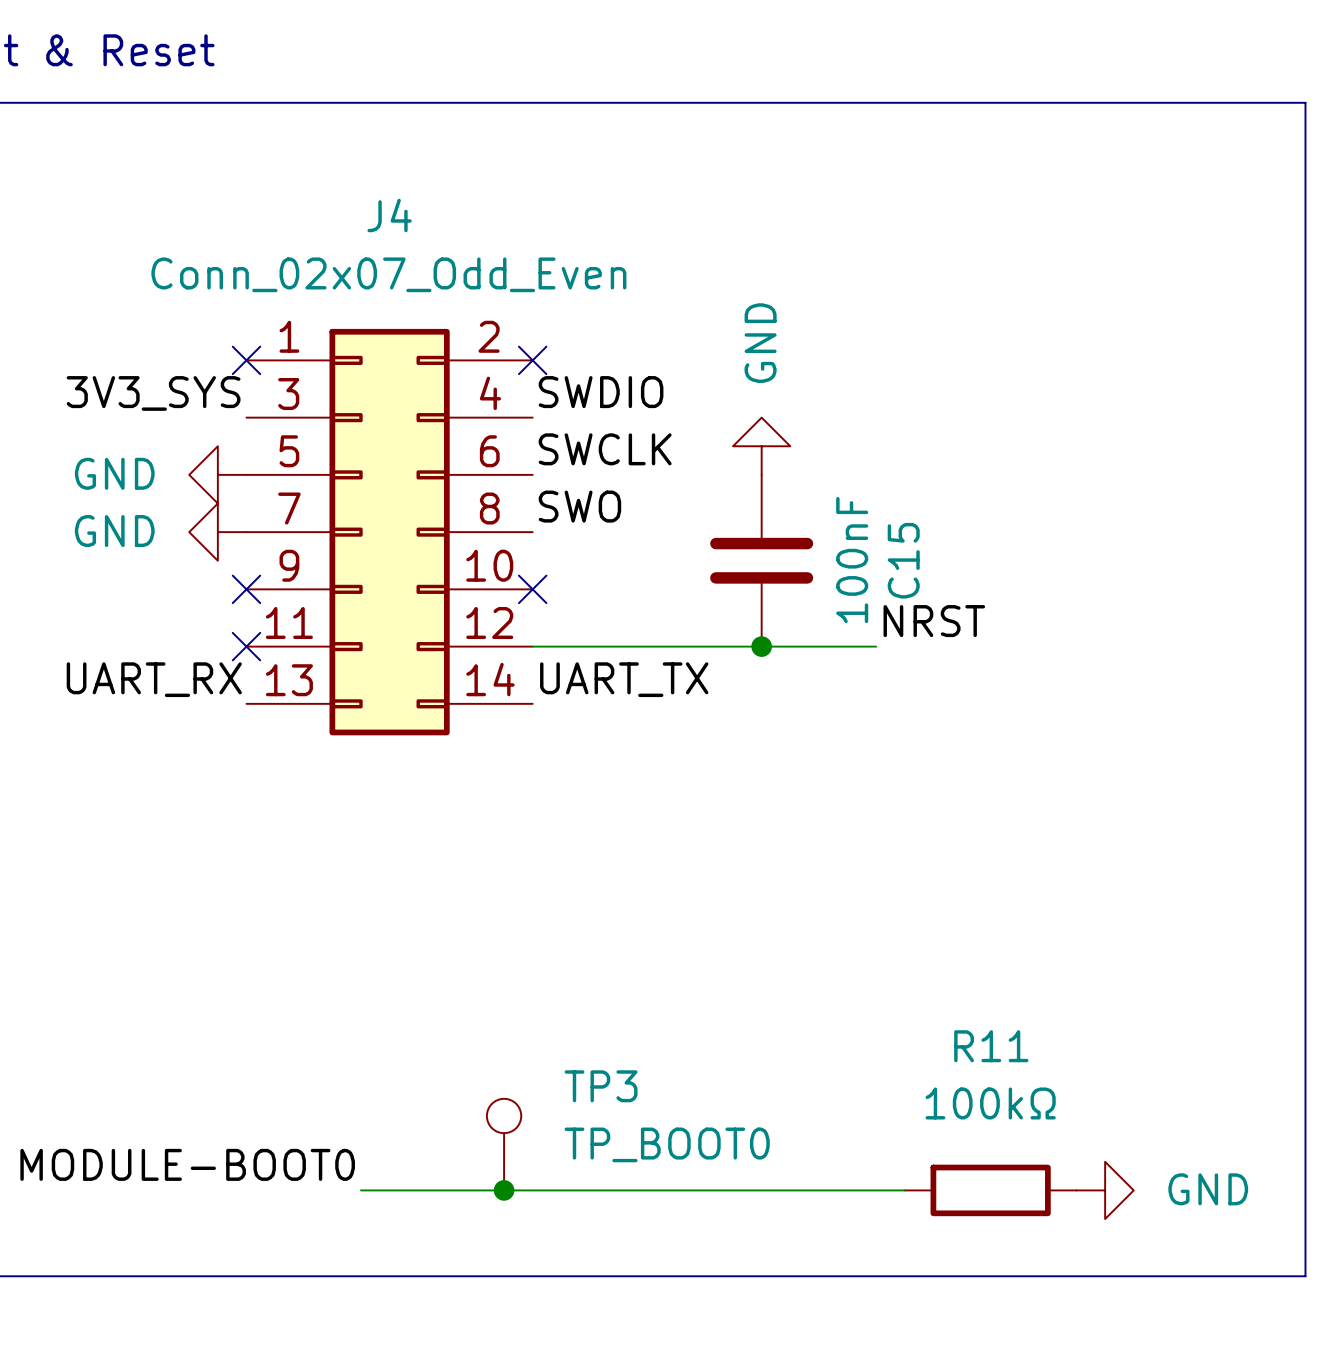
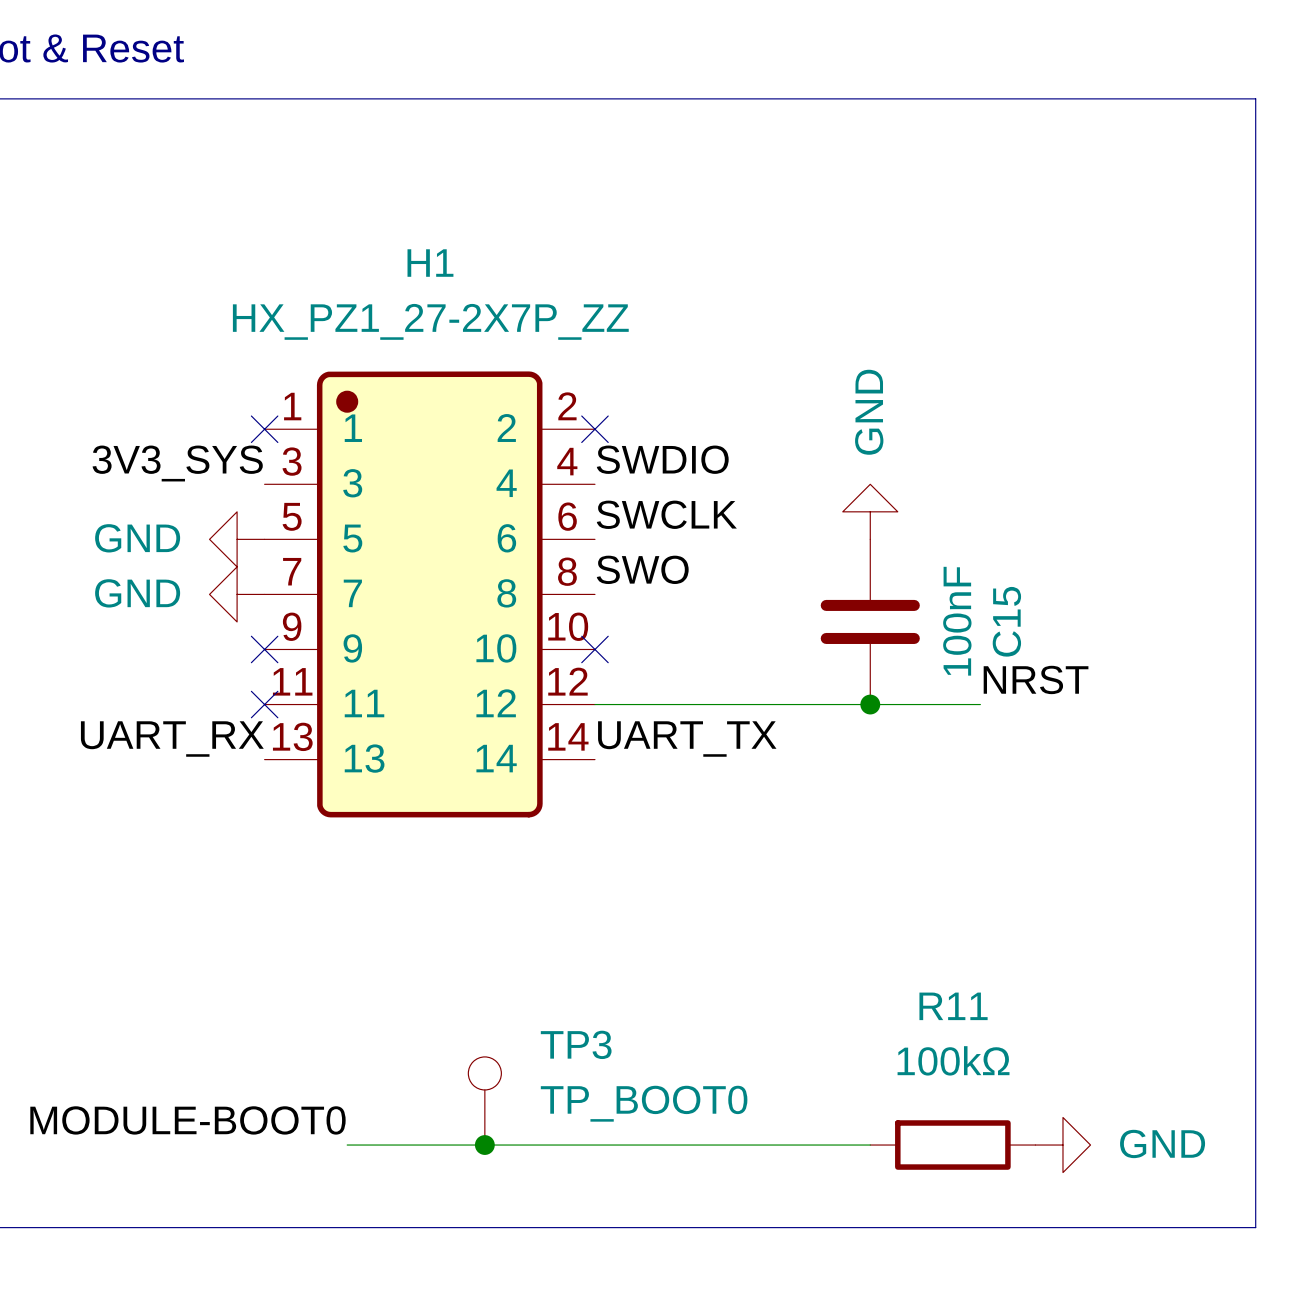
no-connect mark: (246, 360) -> none
no-connect mark: (532, 360) -> none
label position: SWDIO (601, 392) -> SWDIO (662, 459)
label position: 3V3_SYS (153, 393) -> 3V3_SYS (177, 463)
no-connect mark: none -> (264, 429)
no-connect mark: none -> (594, 429)
power symbol position: GND (761, 446) -> GND (870, 511)
label position: SWCLK (605, 449) -> SWCLK (666, 514)
power symbol: GND (217, 474) -> none
label position: SWO (579, 506) -> SWO (642, 569)
power symbol position: GND (217, 532) -> GND (237, 539)
J4: Conn_02x07_Odd_Even (389, 532) -> none
C15 position: (761, 560) -> (870, 621)
no-connect mark: (246, 589) -> none
no-connect mark: (532, 589) -> none
power symbol: none -> GND (237, 594)
H1: none -> HX_PZ1_27-2X7P_ZZ (429, 594)
label position: NRST (934, 621) -> NRST (1036, 679)
no-connect mark position: (246, 646) -> (264, 649)
wire: (532, 646) (876, 646) -> none
junction: (761, 646) -> none
no-connect mark: none -> (594, 649)
label position: UART_RX (154, 679) -> UART_RX (172, 739)
label position: UART_TX (624, 679) -> UART_TX (687, 739)
no-connect mark: none -> (264, 704)
wire: none -> (594, 704) (980, 704)
junction: none -> (870, 704)

